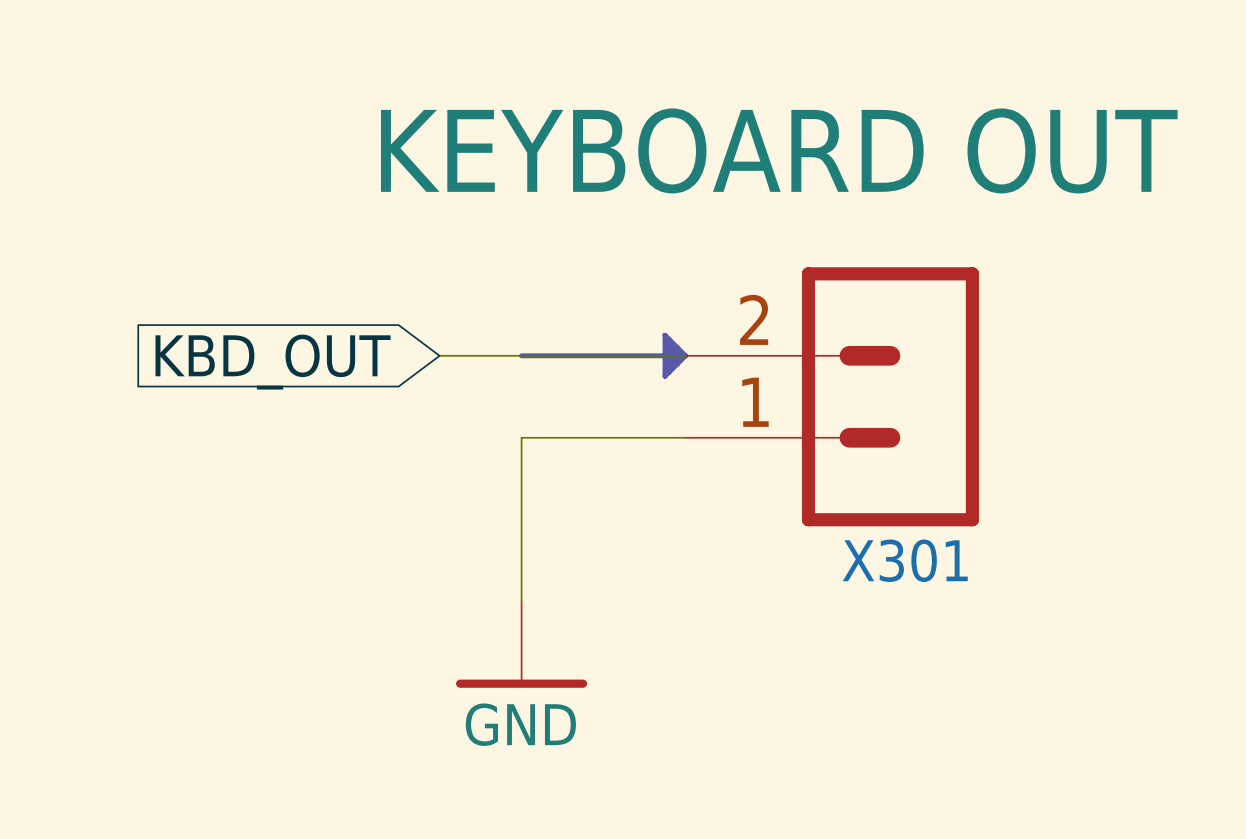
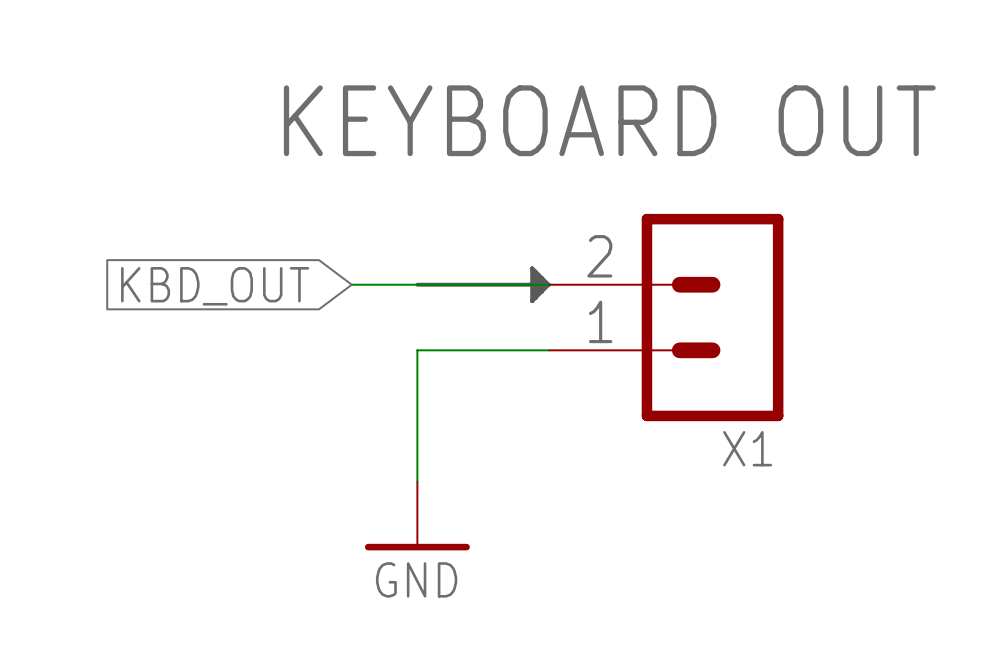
X301 name: X301 (905, 560) -> X1 (747, 448)

